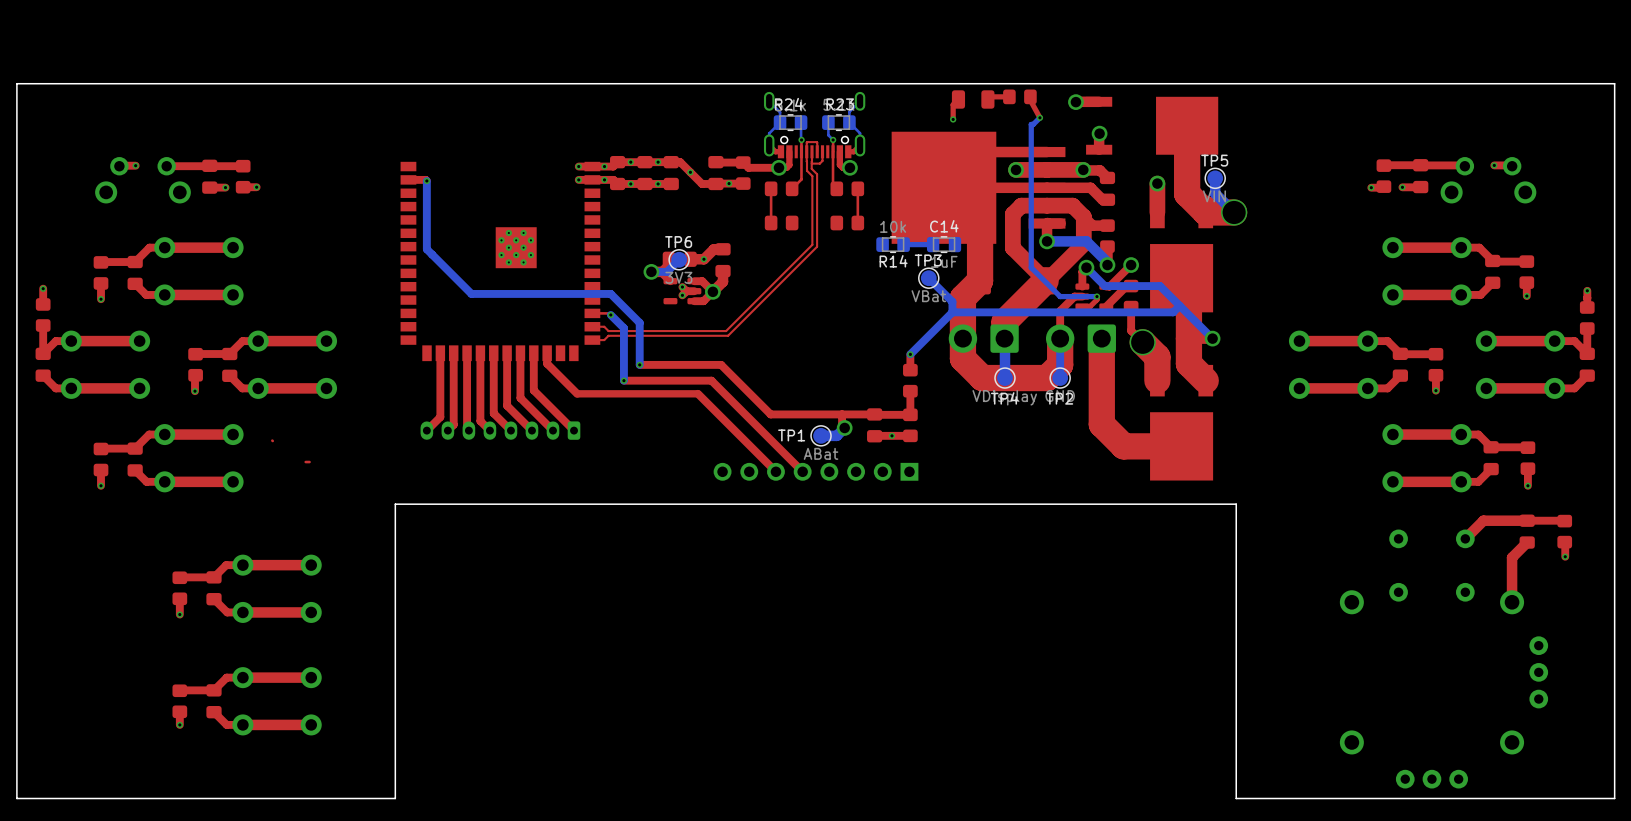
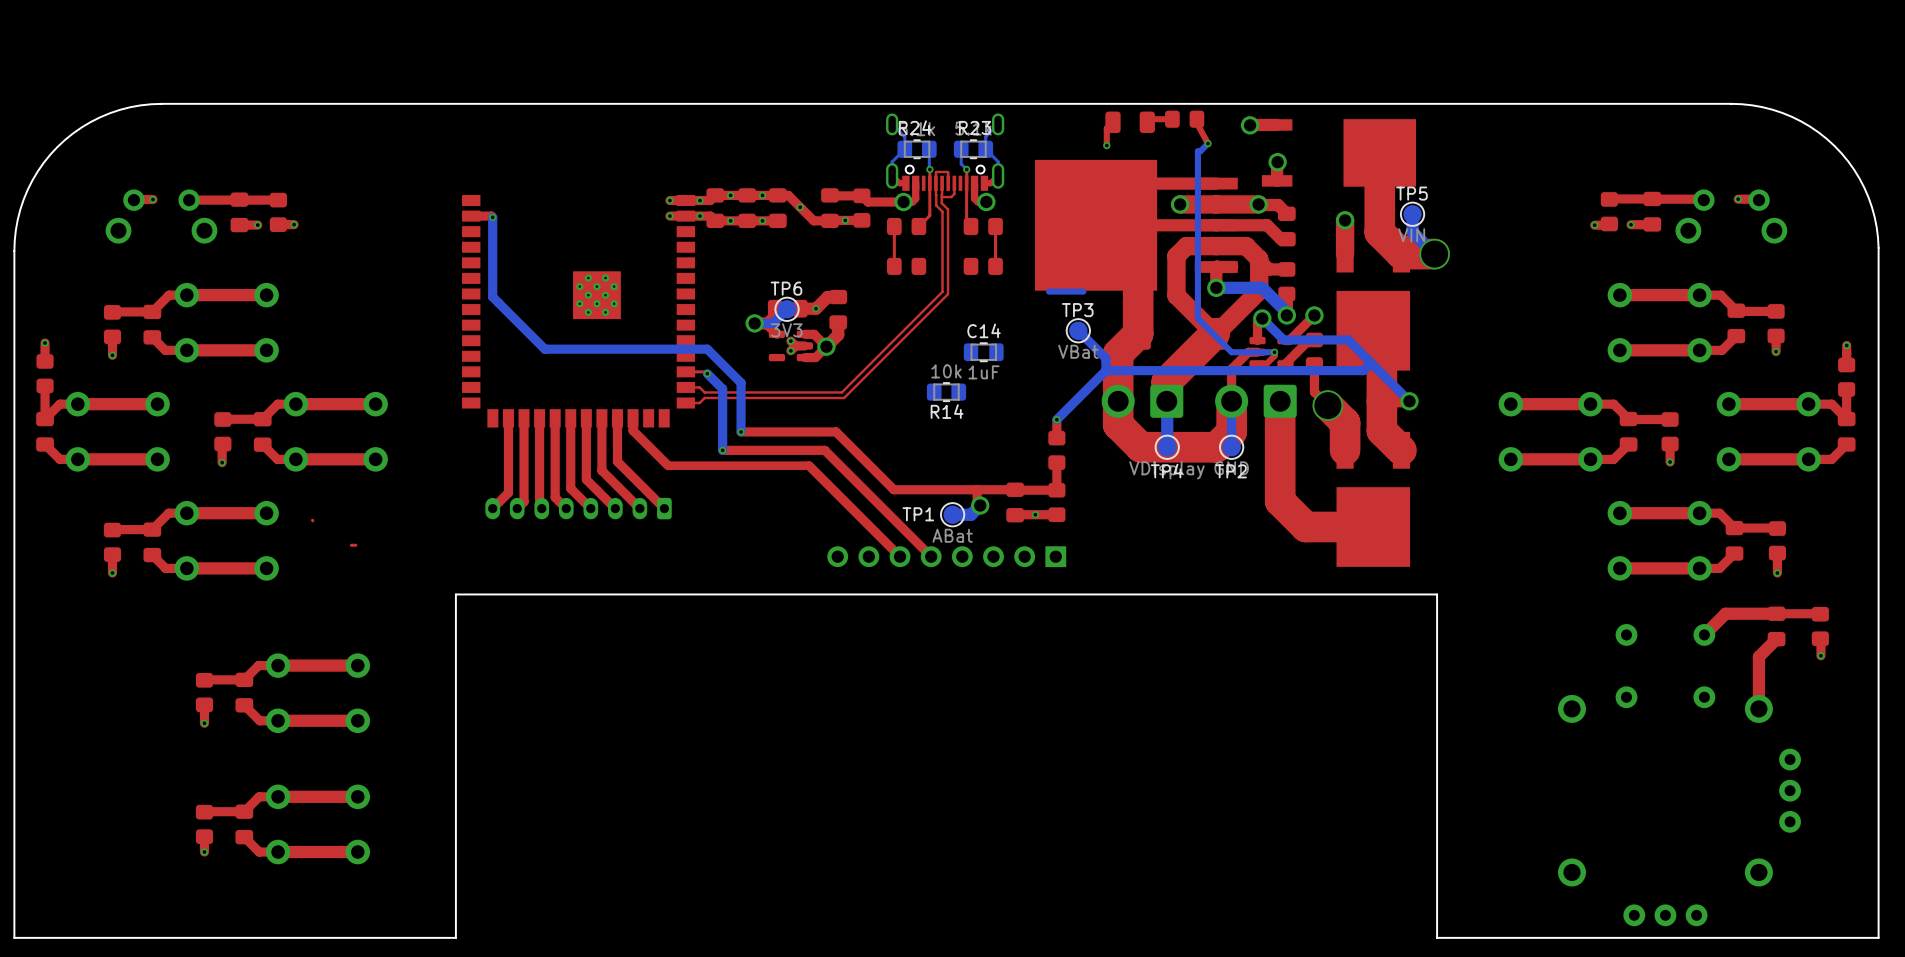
board edge: (143, 83) (16, 83) (16, 209) -> (161, 103) (130, 107) (110, 113) (81, 127) (57, 146) (37, 171) (23, 199) (15, 230) (14, 251)
board edge: (1488, 83) (1614, 83) (1614, 207) -> (1731, 103) (1752, 105) (1782, 112) (1810, 126) (1834, 145) (1854, 169) (1868, 197) (1876, 227) (1878, 247)
R14 position: (893, 244) -> (946, 392)
C14 position: (944, 244) -> (983, 352)

